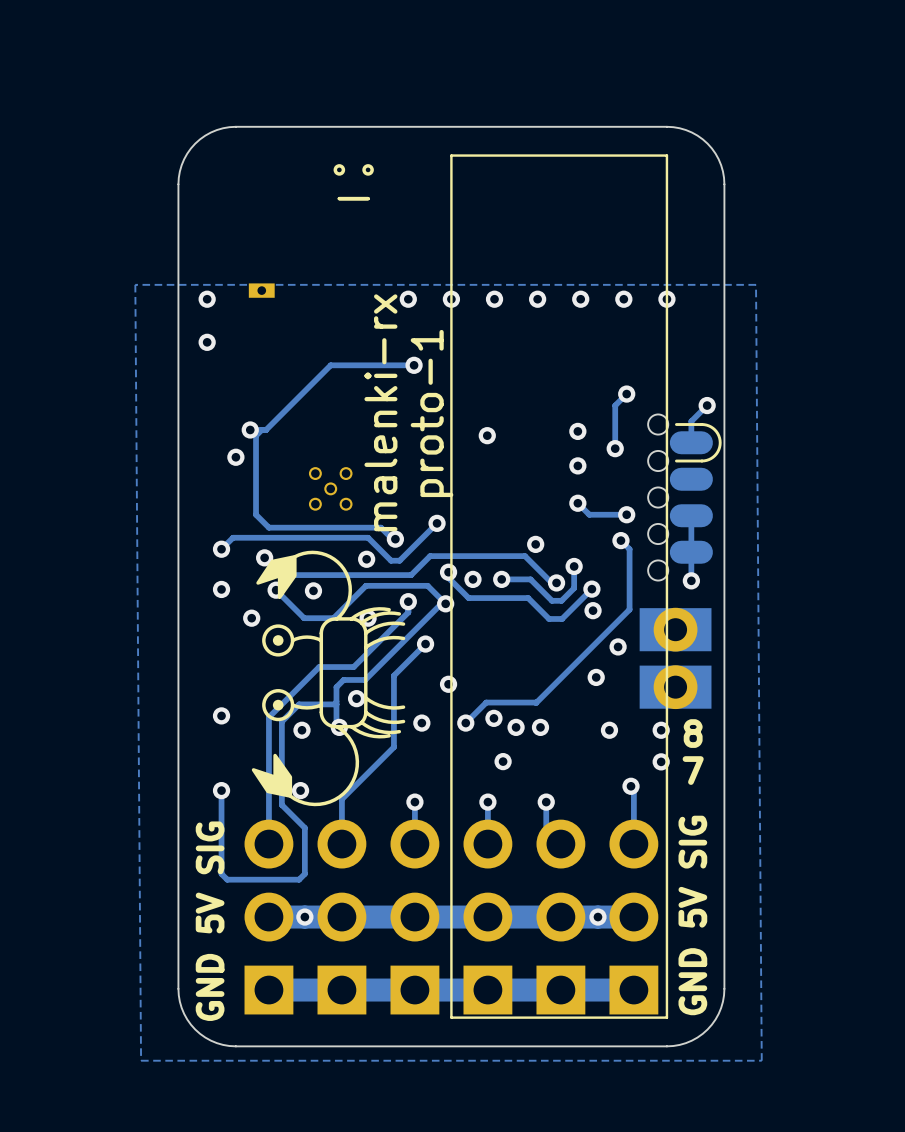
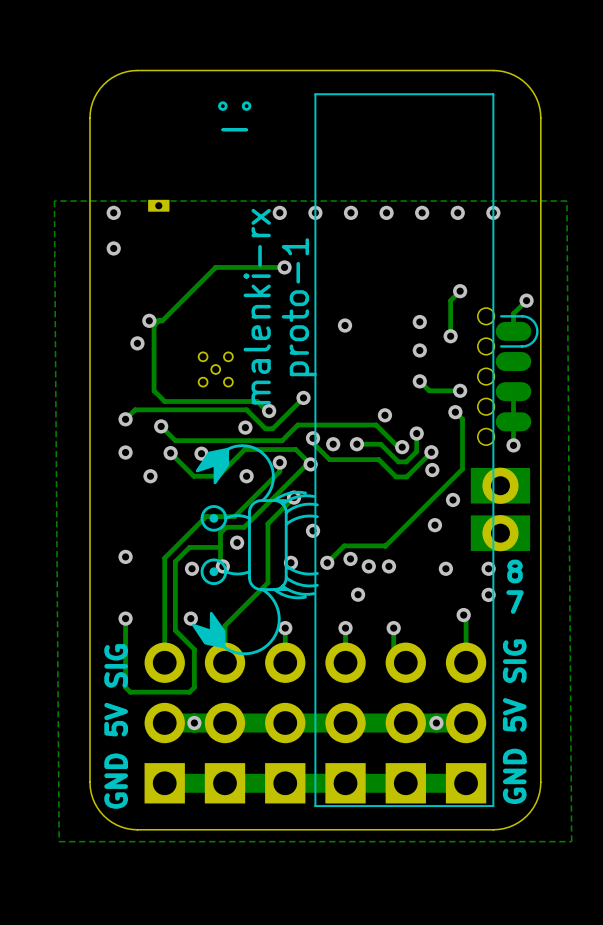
drawing: [251, 550, 406, 807] -> none
drawing: none -> [192, 444, 319, 656]

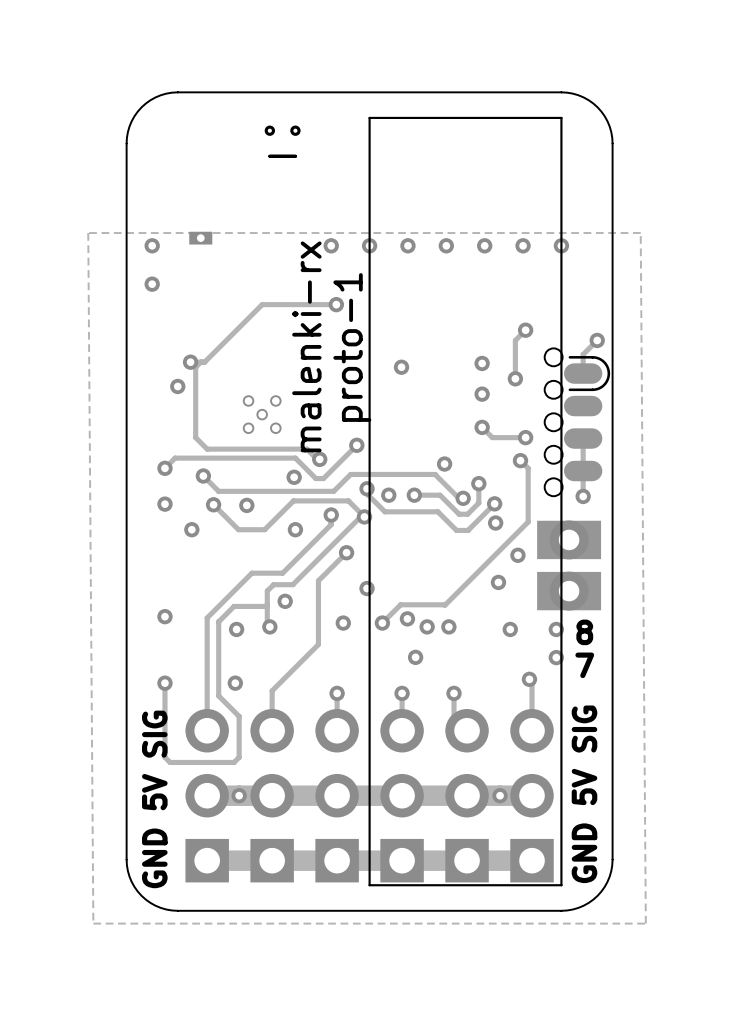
drawing: [192, 444, 319, 656] -> none

